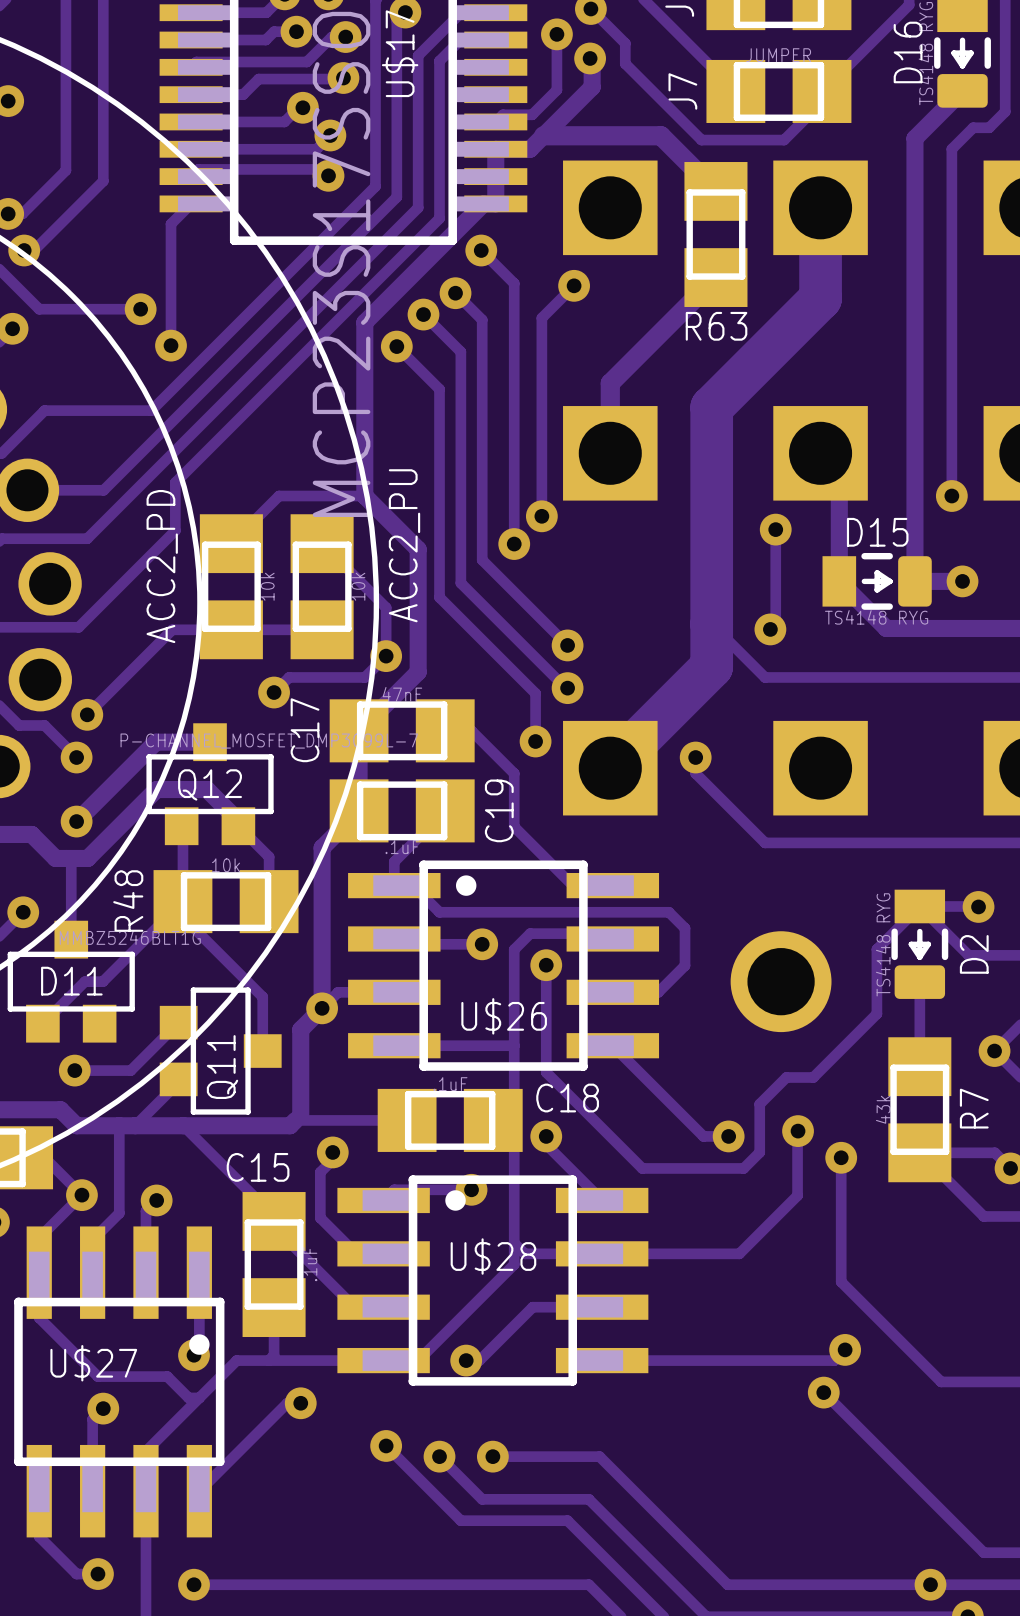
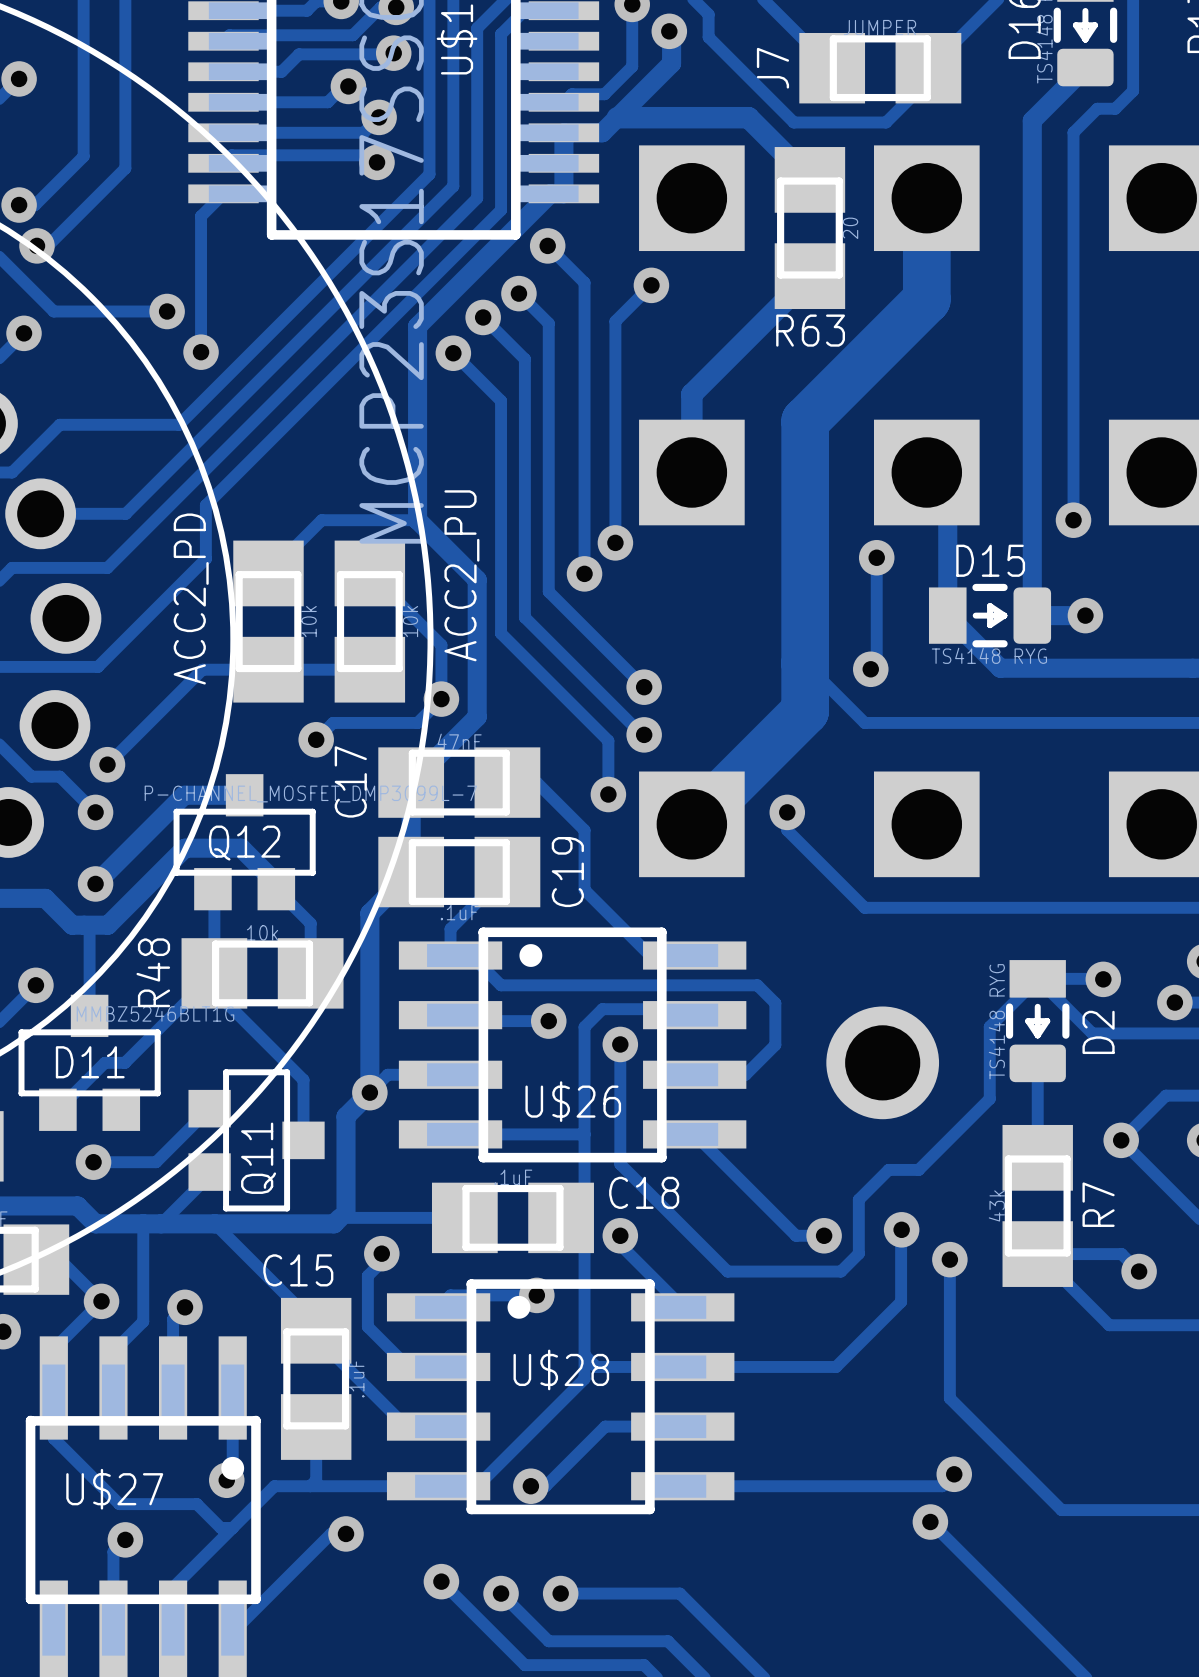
R63 value: none -> 20 (850, 228)

